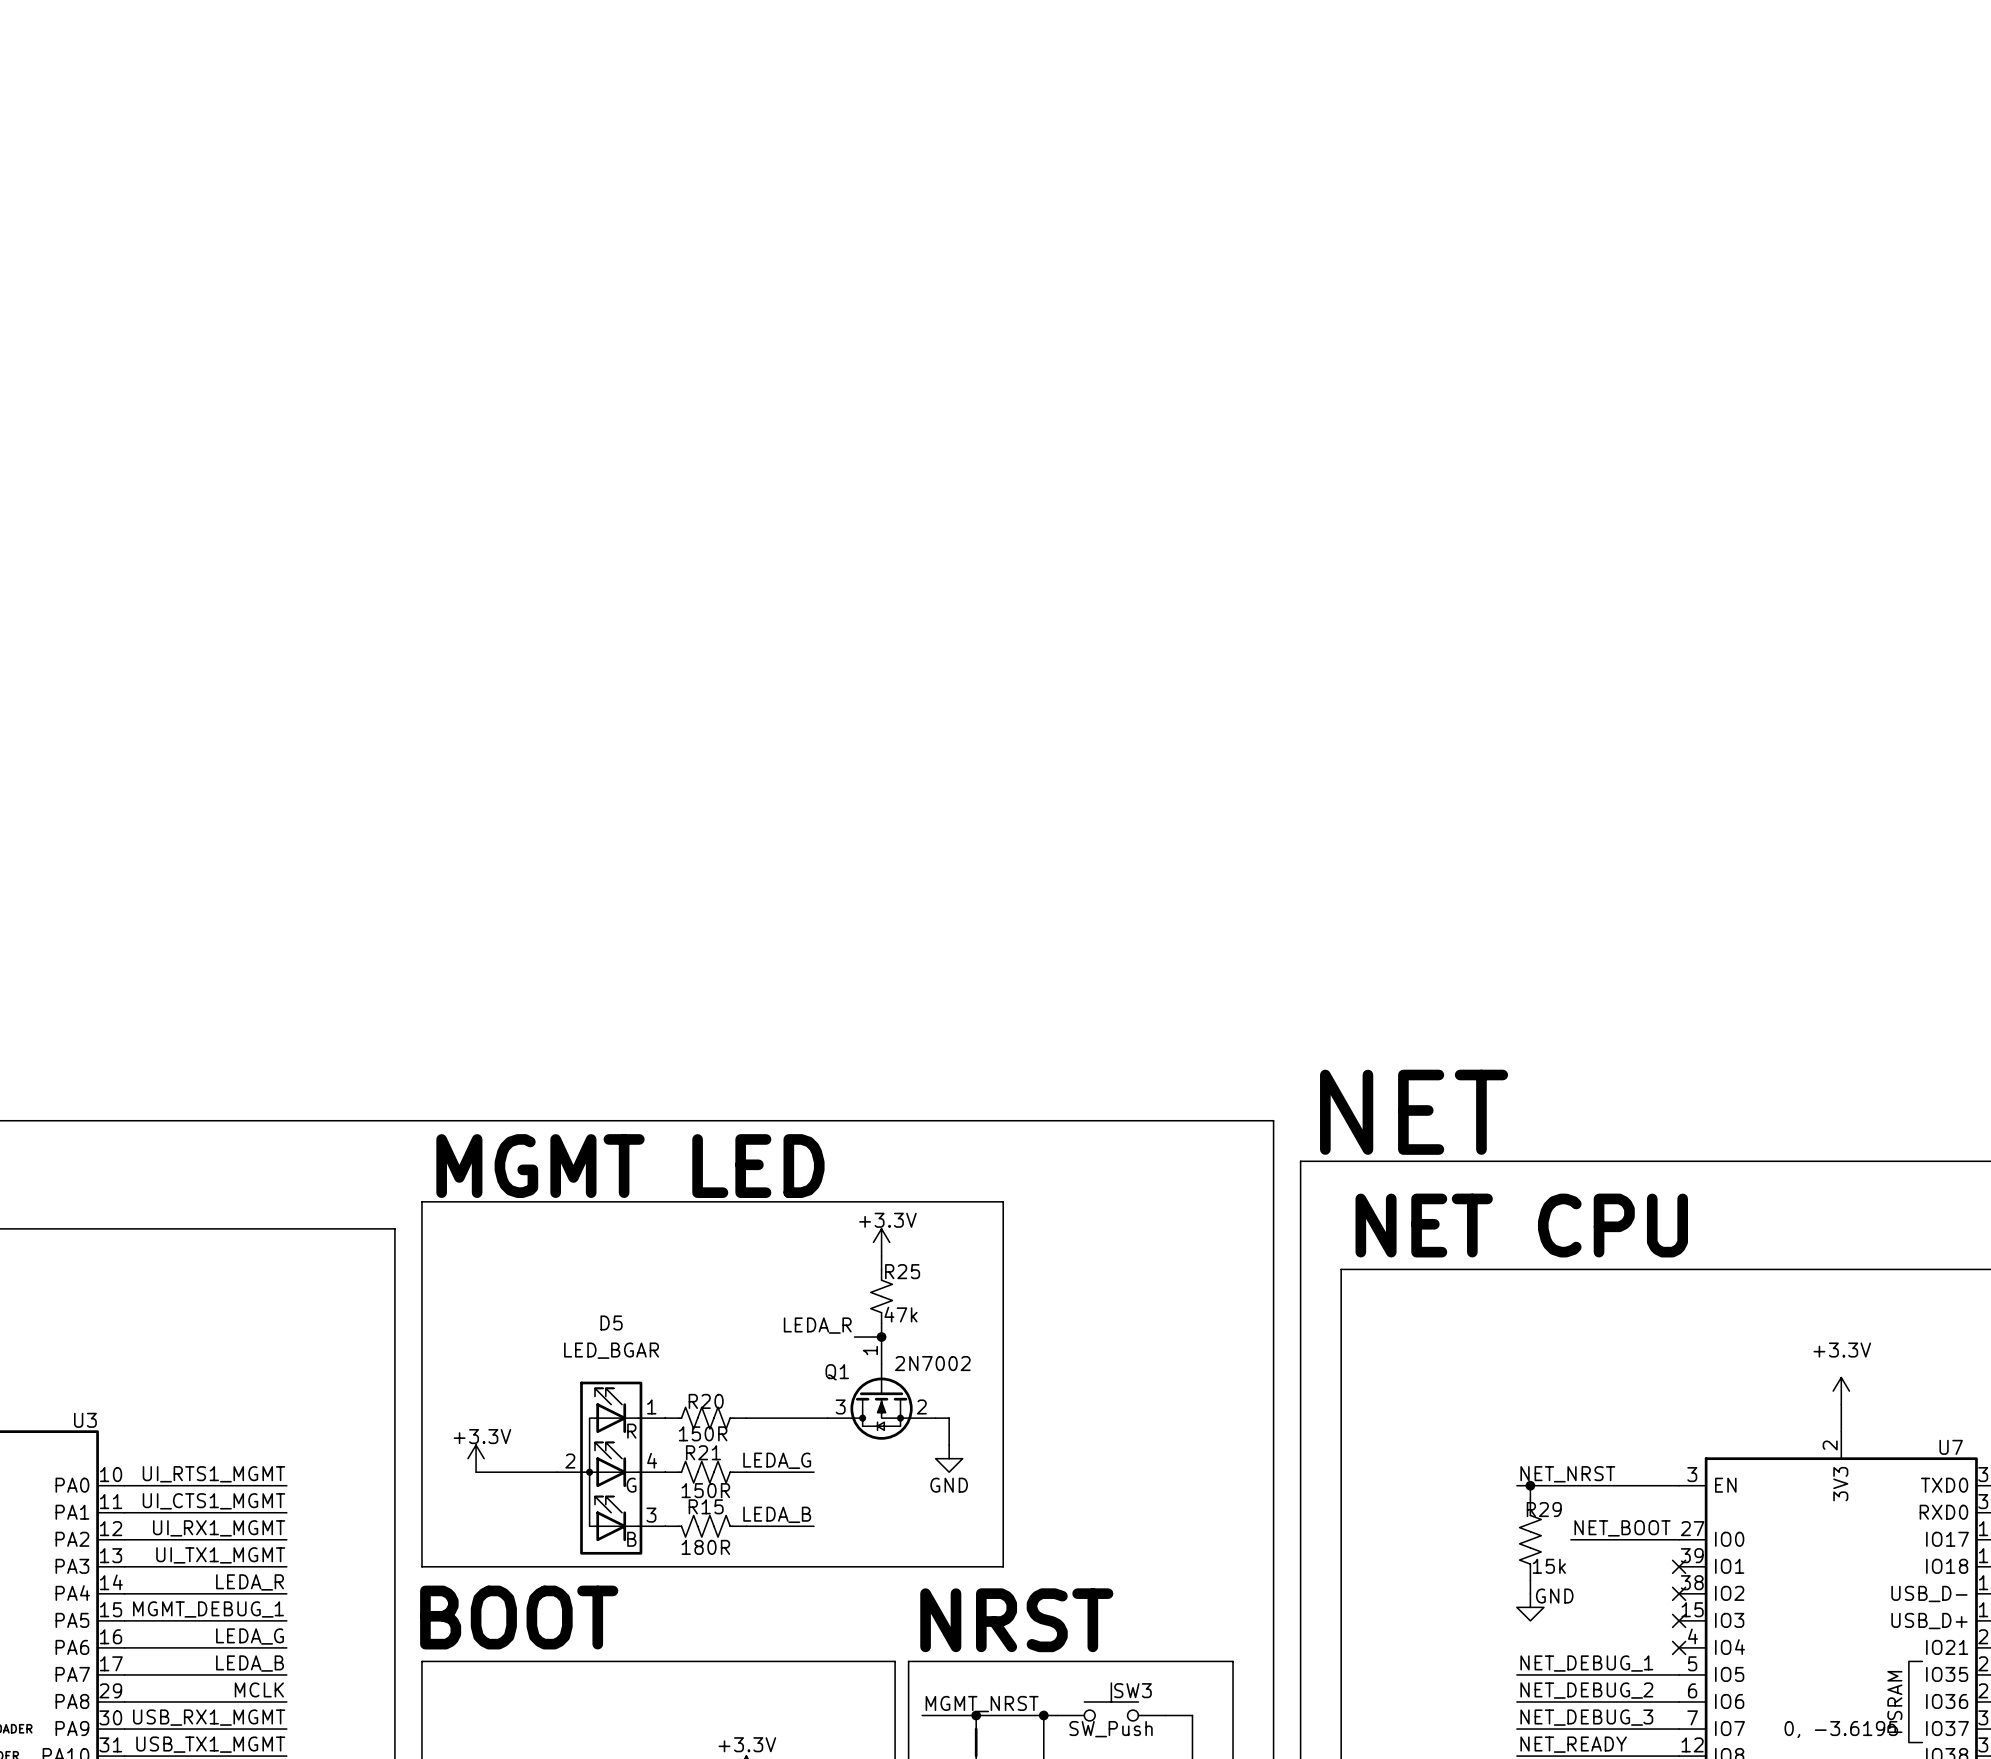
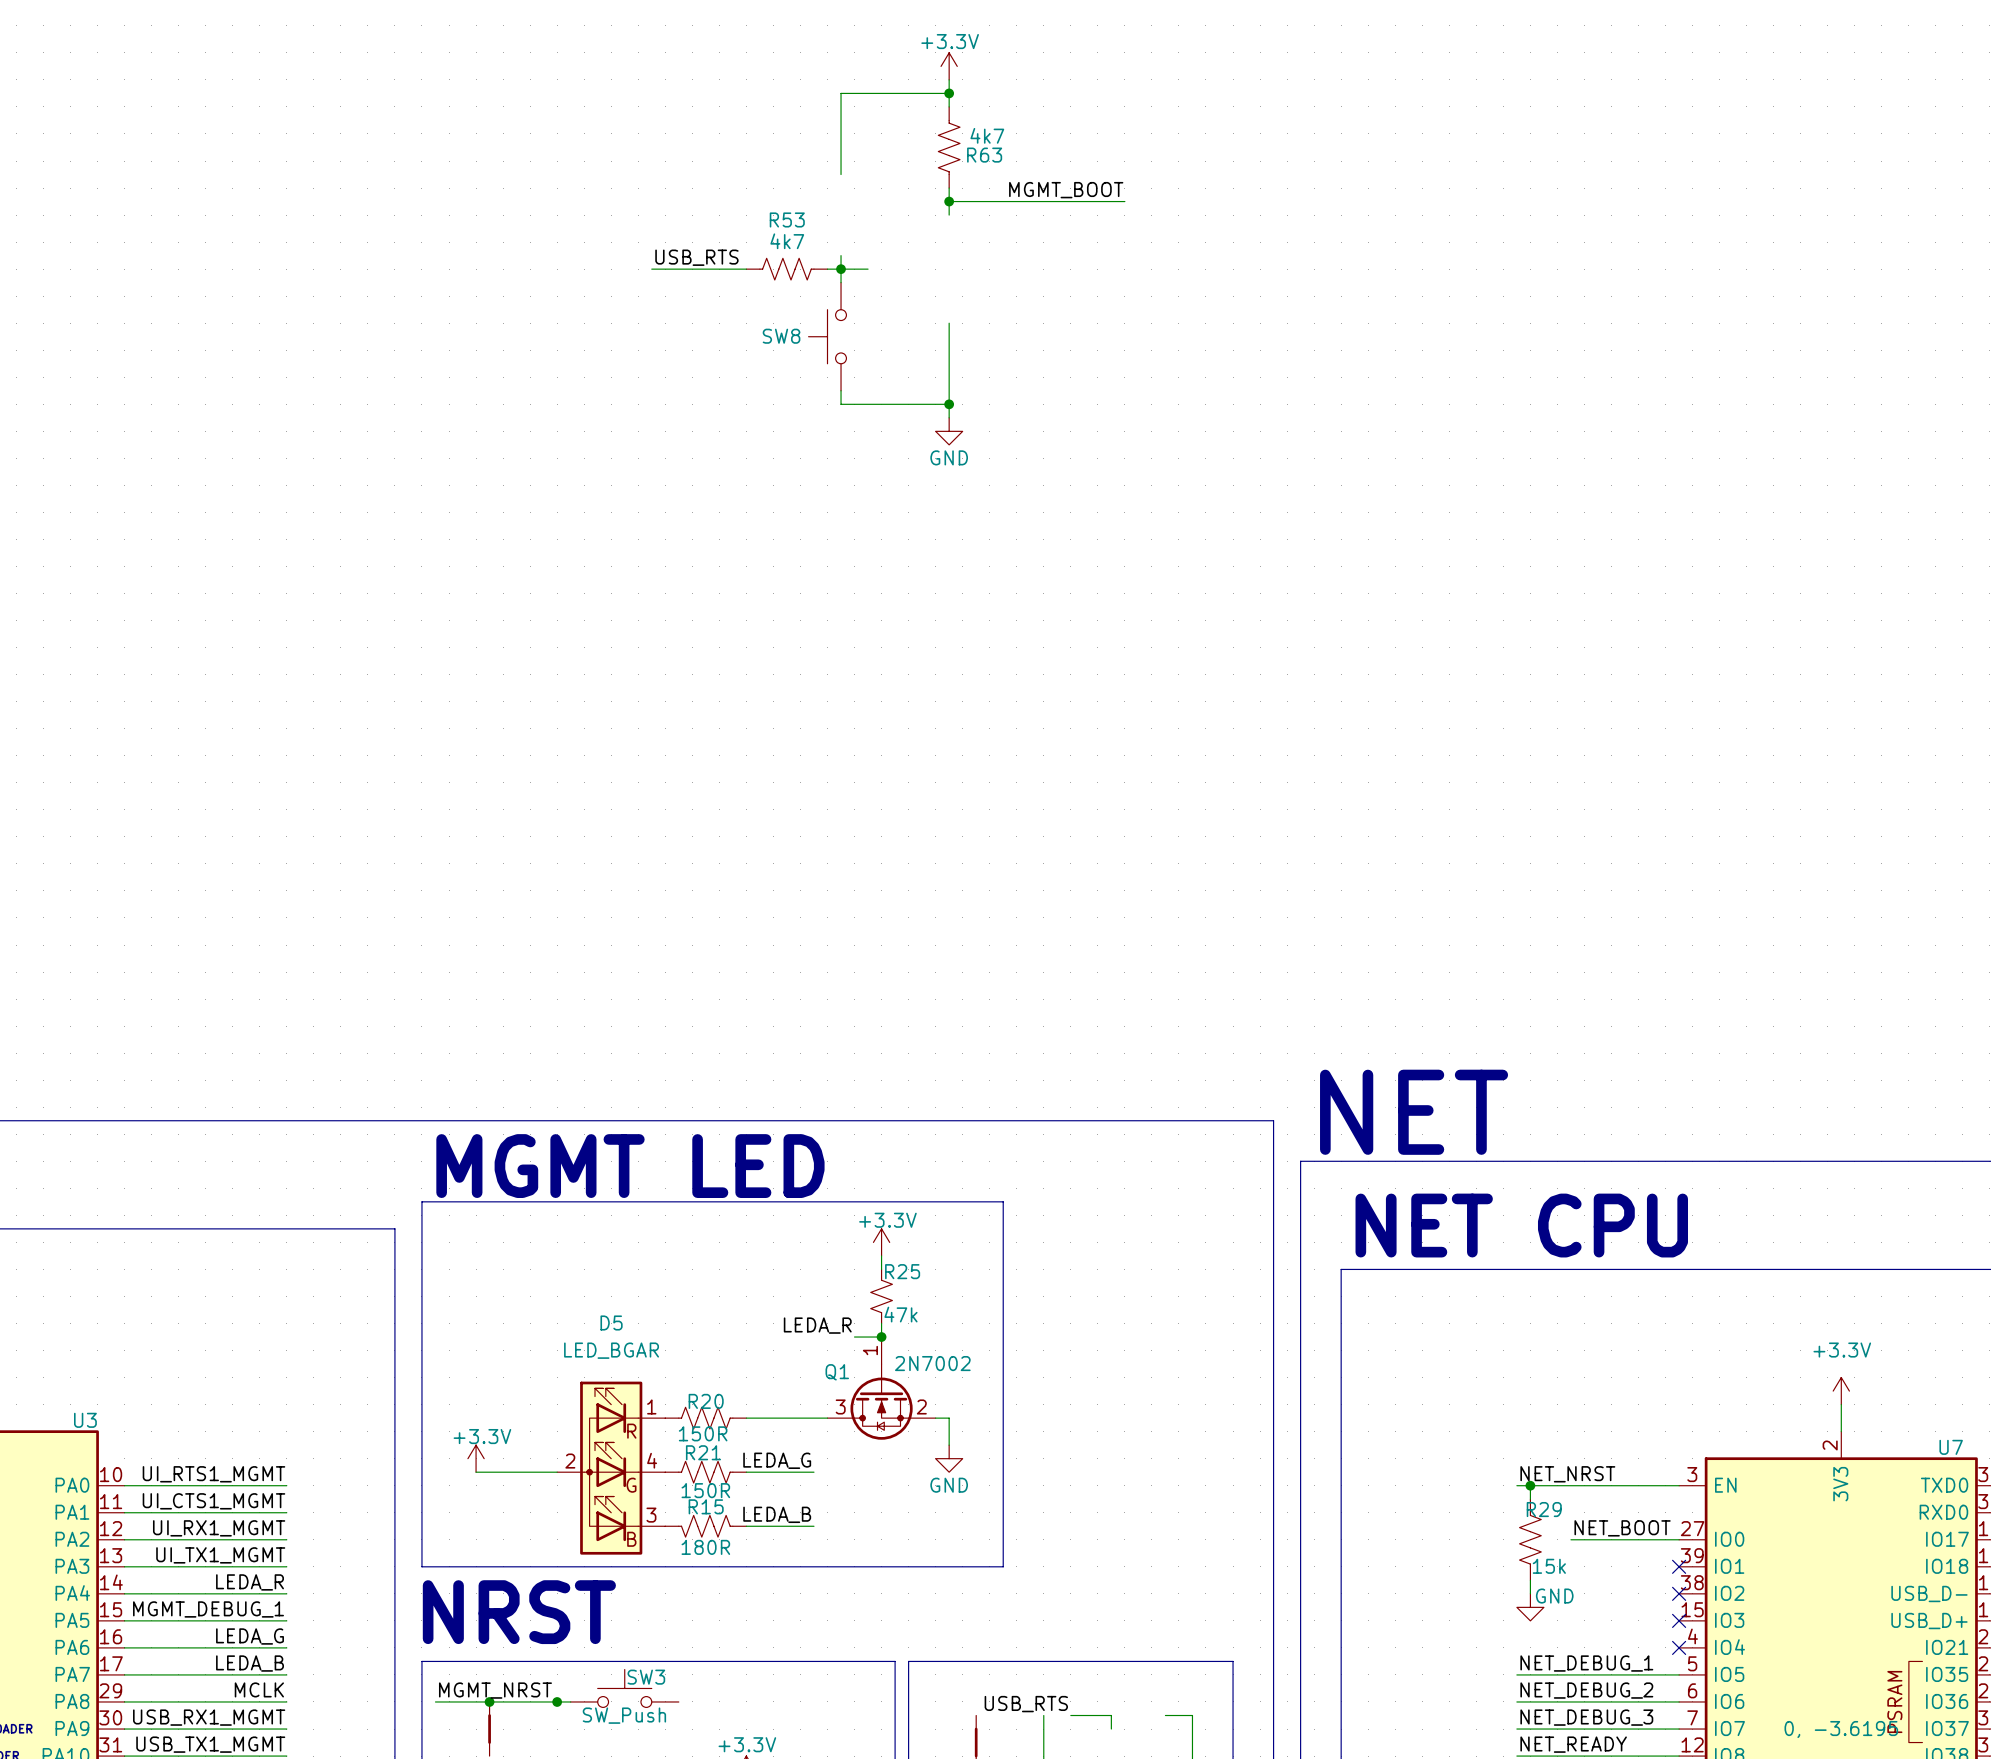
power symbol: none -> +3.3V (949, 66)
wire: none -> (949, 79) (949, 106)
wire: none -> (949, 93) (841, 93) (841, 174)
junction: none -> (949, 93)
R63: none -> 4k7 (949, 147)
wire: none -> (949, 188) (949, 215)
label: none -> MGMT_BOOT (1066, 190)
wire: none -> (949, 201) (1124, 201)
junction: none -> (949, 201)
wire: none -> (841, 255) (841, 282)
label: none -> USB_RTS (696, 257)
wire: none -> (651, 269) (746, 269)
R53: none -> 4k7 (786, 269)
wire: none -> (827, 269) (868, 269)
junction: none -> (841, 269)
wire: none -> (949, 323) (949, 417)
SW8: none -> (827, 336)
wire: none -> (841, 390) (841, 404) (949, 404)
junction: none -> (949, 404)
power symbol: none -> GND (949, 431)
text: BOOT (519, 1617) -> NRST (519, 1612)
text: NRST (1016, 1620) -> none
label: none -> MGMT_NRST (495, 1690)
wire: none -> (435, 1701) (570, 1701)
junction: none -> (489, 1701)
junction: none -> (557, 1701)
SW3 position: (1111, 1701) -> (624, 1688)
label: MGMT_NRST (982, 1704) -> none
label: none -> USB_RTS (1026, 1704)
wire: (922, 1715) (1057, 1715) -> none
junction: (976, 1715) -> none
junction: (1043, 1715) -> none
wire: none -> (1070, 1715) (1111, 1715) (1111, 1729)
part: none -> (489, 1729)

